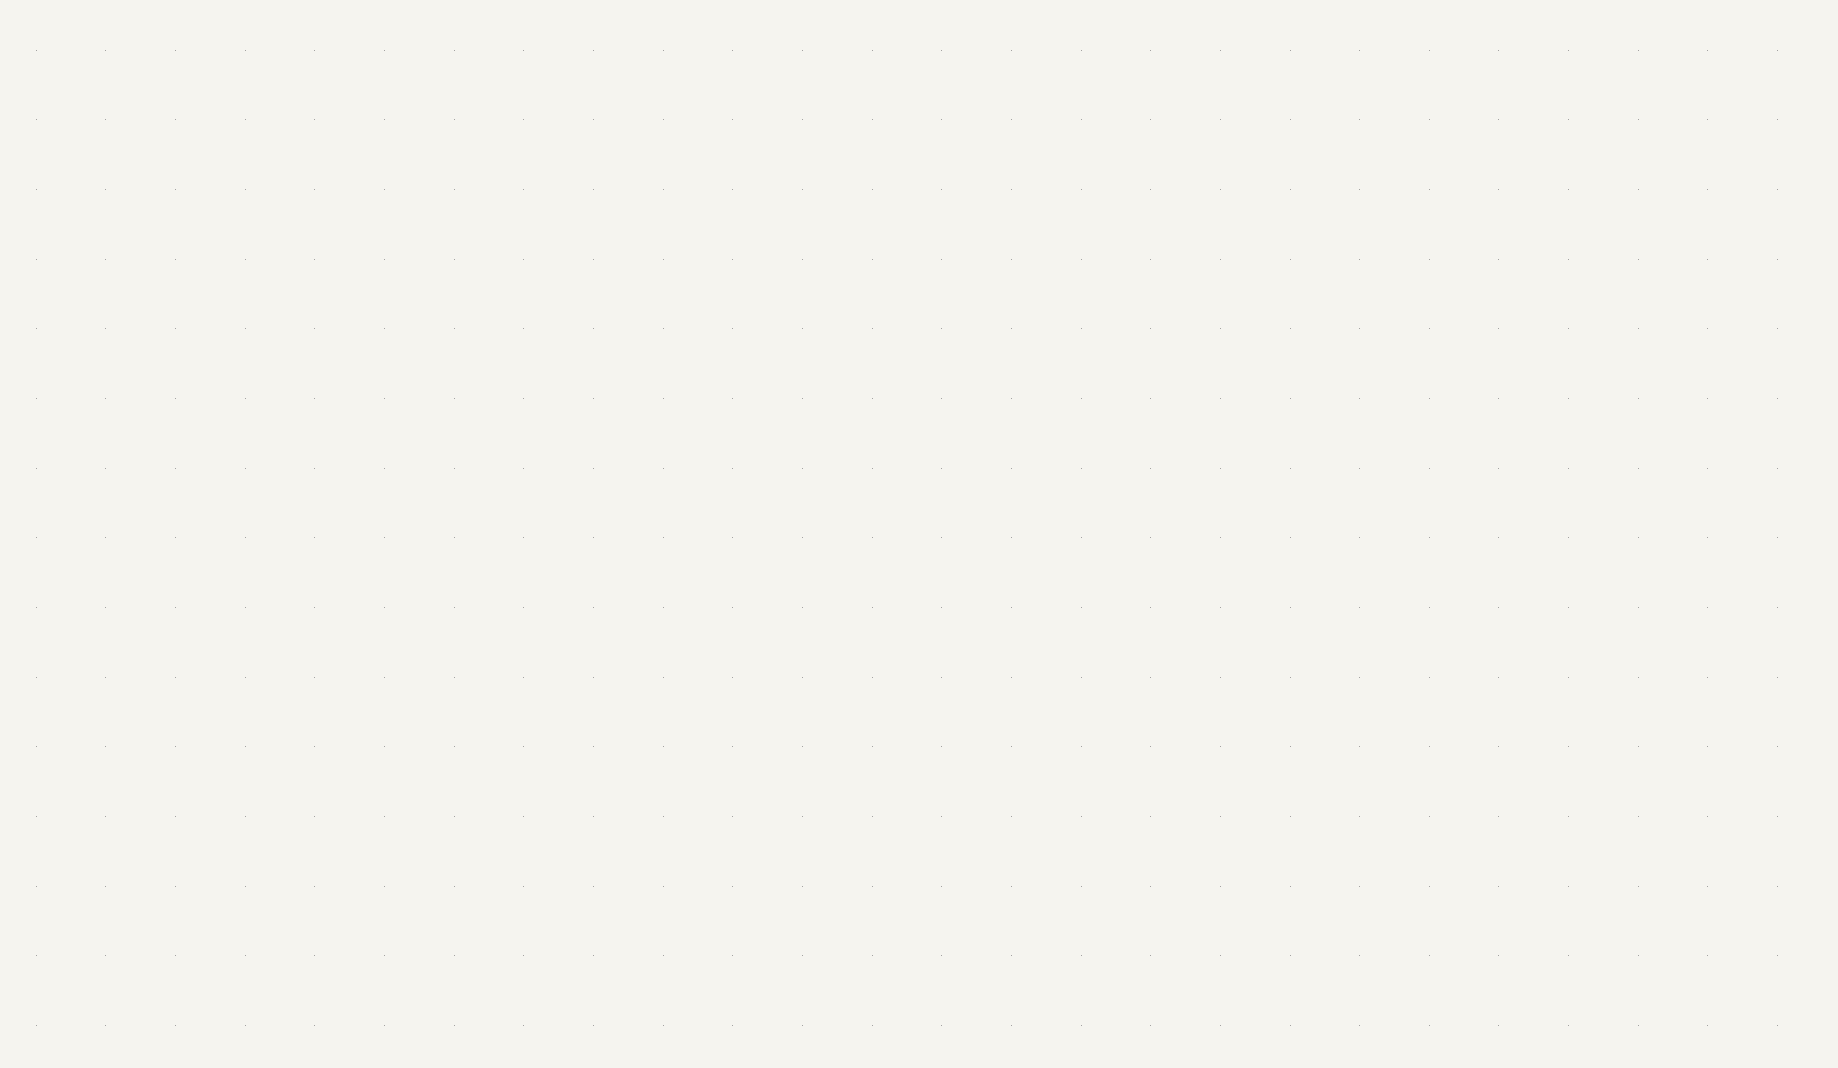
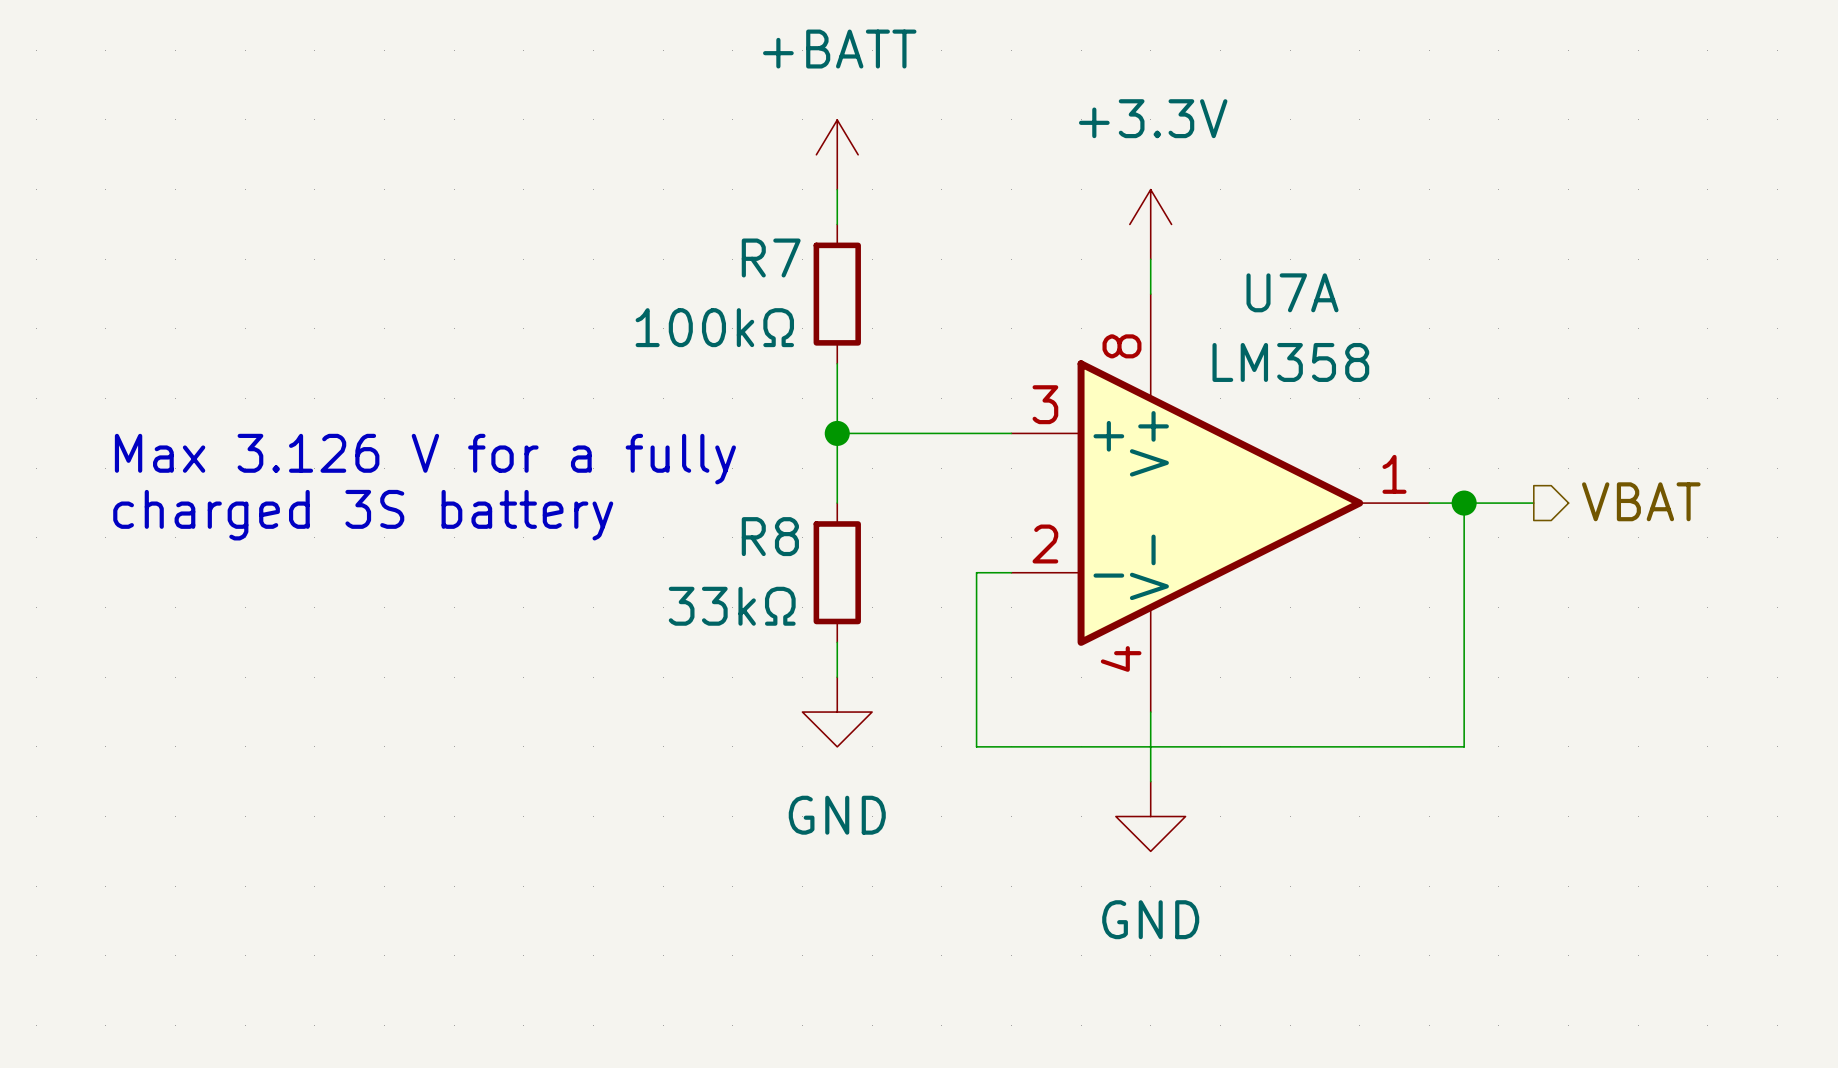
power symbol: none -> +BATT (837, 154)
wire: none -> (837, 189) (837, 224)
power symbol: none -> +3.3V (1150, 224)
wire: none -> (1150, 259) (1150, 294)
R7: none -> 100kΩ (837, 294)
wire: none -> (837, 363) (837, 503)
wire: none -> (837, 433) (1011, 433)
junction: none -> (837, 433)
text: none -> Max 3.126 V for a fully (425, 459)
hierarchical label: none -> VBAT (1641, 501)
part: none -> (1150, 503)
U7A: none -> LM358 (1220, 503)
wire: none -> (1429, 503) (1533, 503)
wire: none -> (1464, 503) (1464, 746) (976, 746) (976, 572) (1011, 572)
junction: none -> (1464, 503)
text: none -> charged 3S battery (363, 515)
R8: none -> 33kΩ (837, 572)
wire: none -> (837, 642) (837, 677)
power symbol: none -> GND (837, 712)
wire: none -> (1150, 712) (1150, 781)
power symbol: none -> GND (1150, 816)

